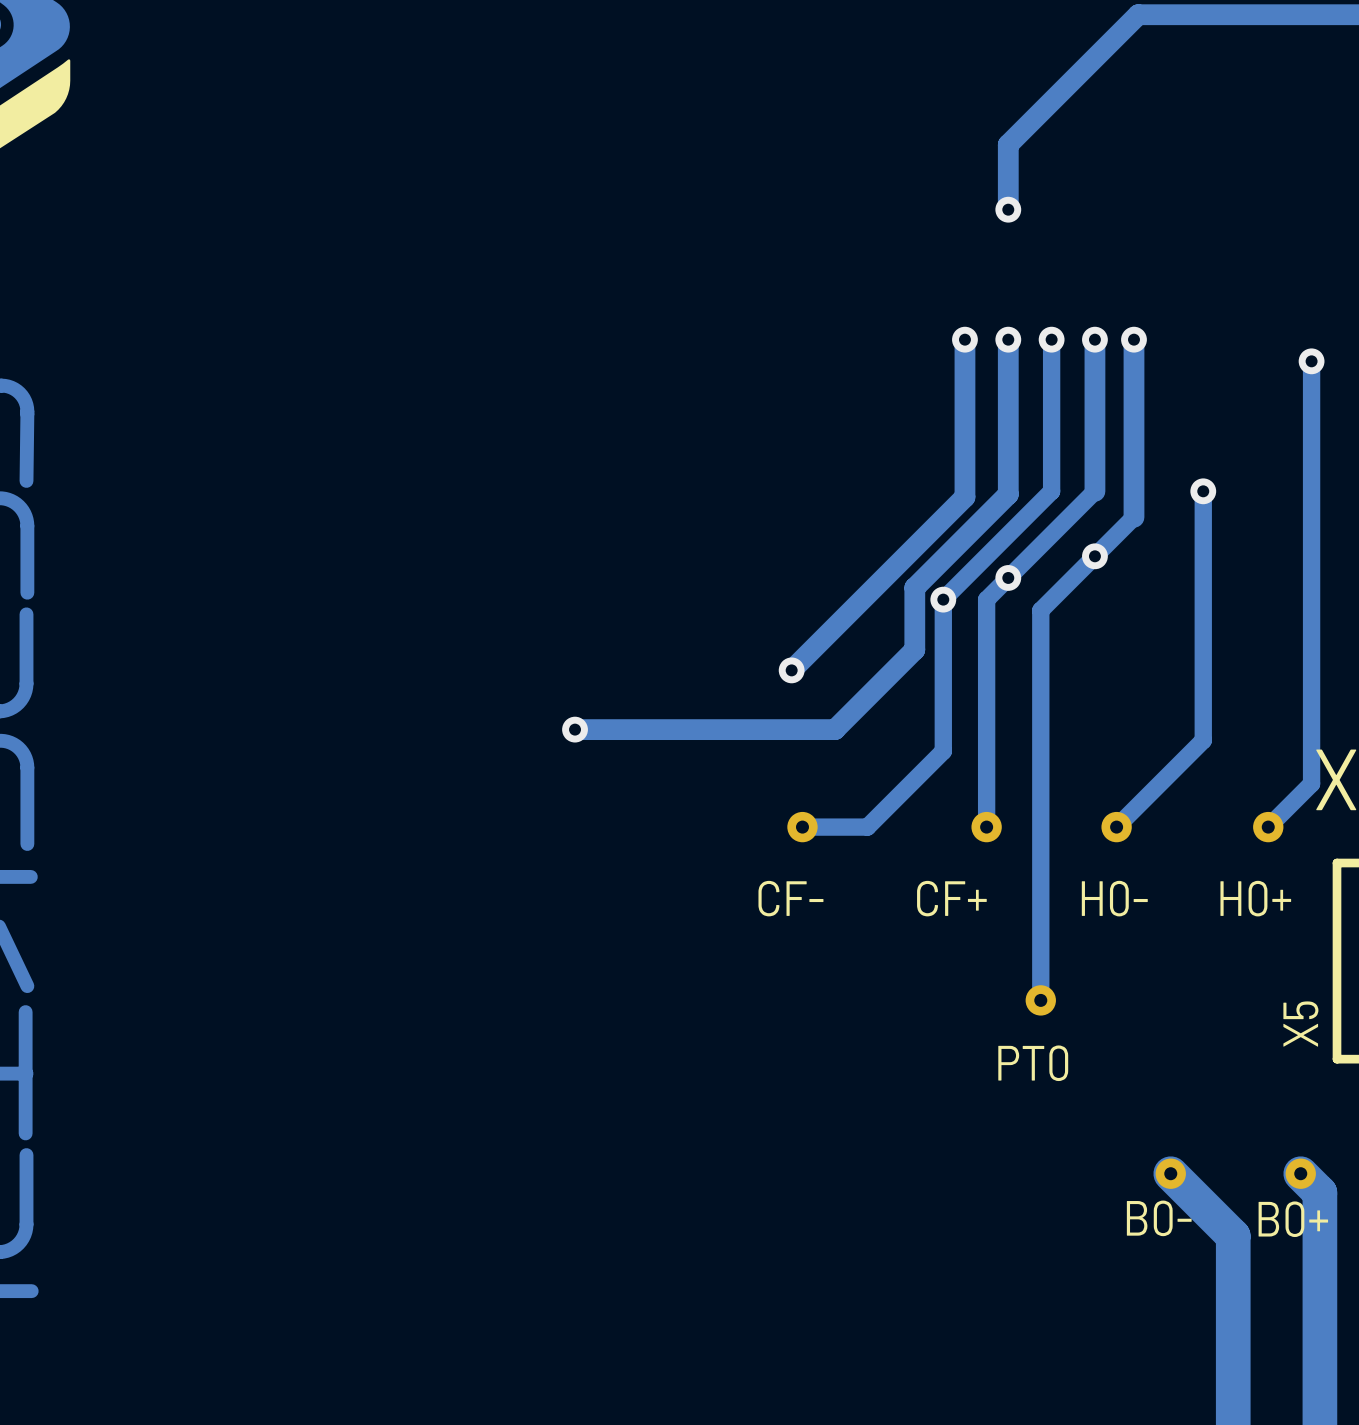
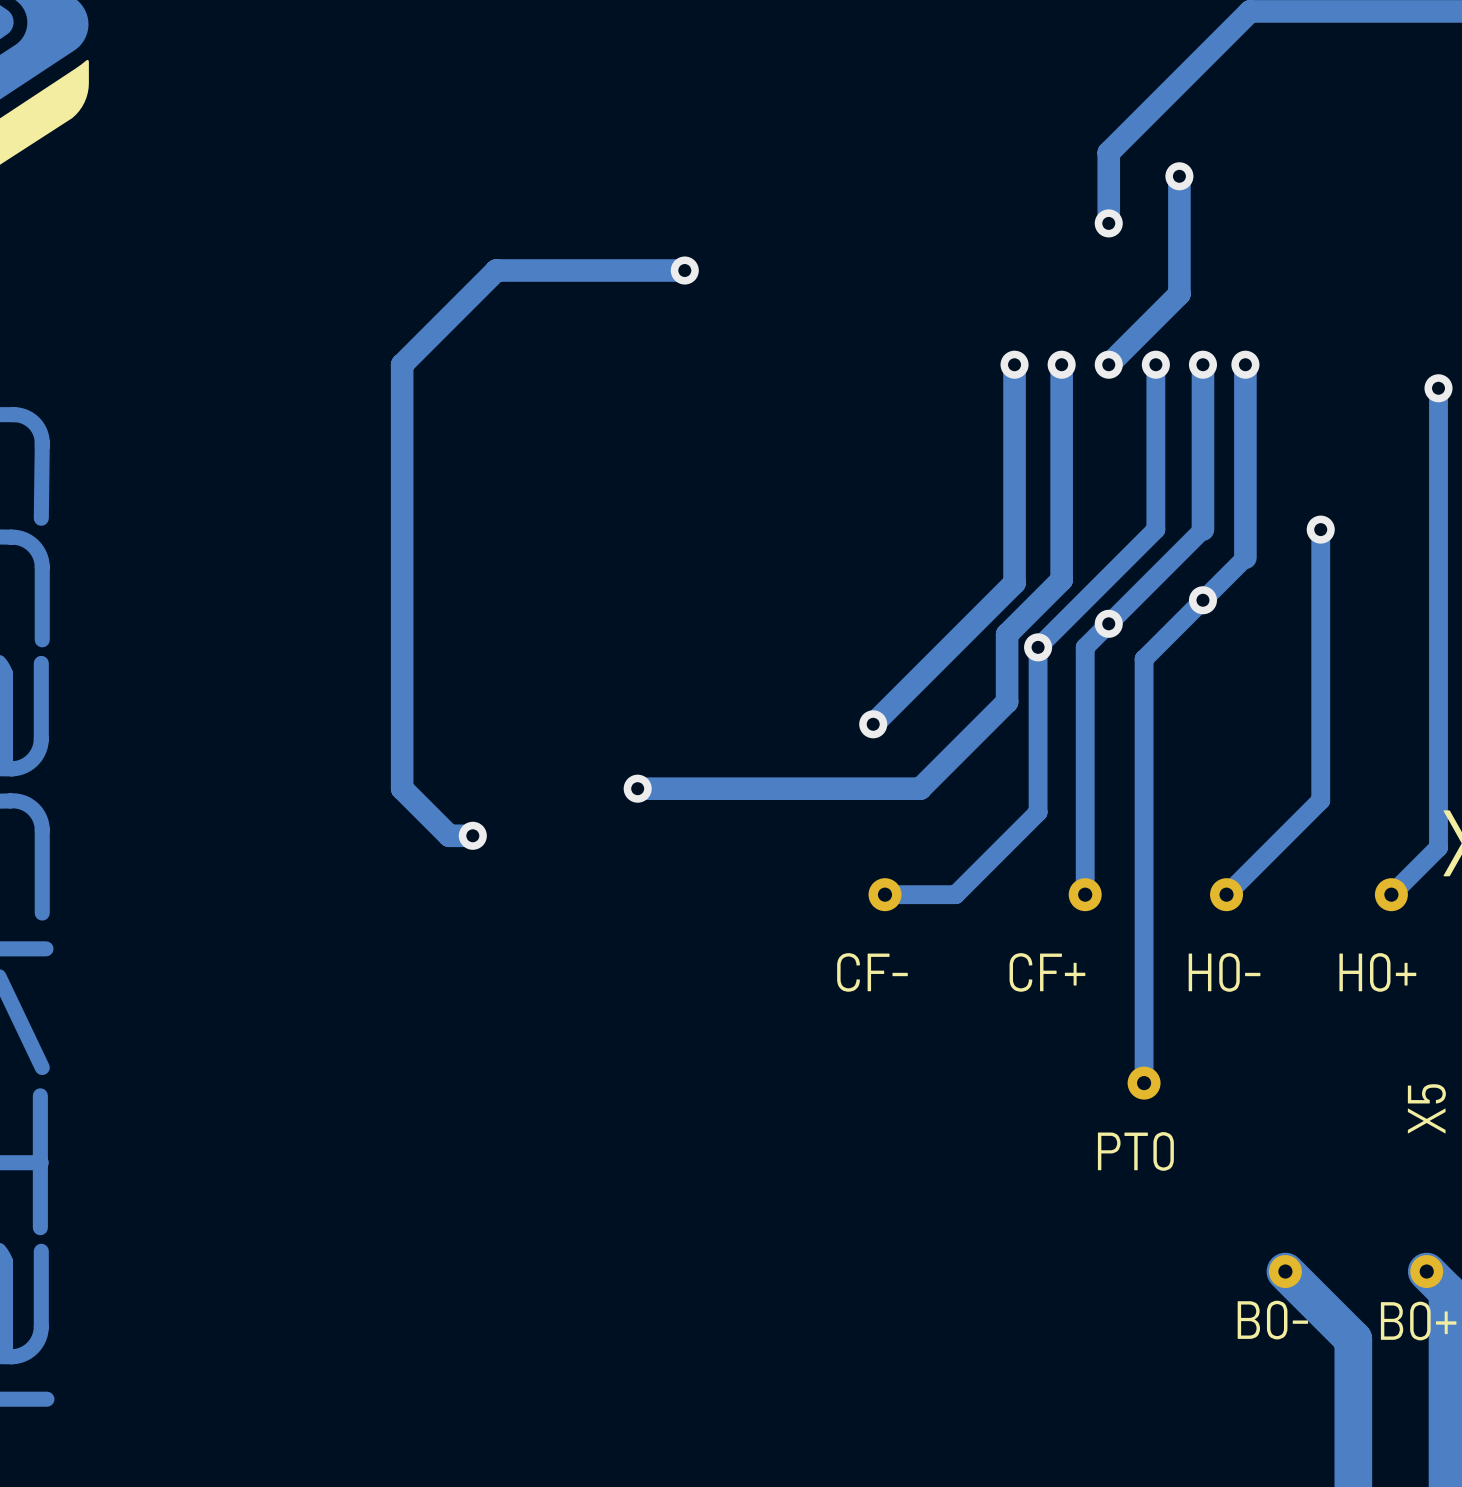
via: none -> (1179, 176)
track: none -> (684, 270) (496, 270) (402, 364) (402, 788) (449, 835) (472, 835)
via: none -> (684, 270)
track: none -> (1014, 364) (1014, 582)
via: none -> (1014, 364)
track: (1008, 339) (1008, 494) (964, 537) -> (1108, 364) (1179, 294) (1179, 176)
track: (964, 497) (921, 540) -> (1061, 535) (1061, 579)
via: none -> (472, 835)

